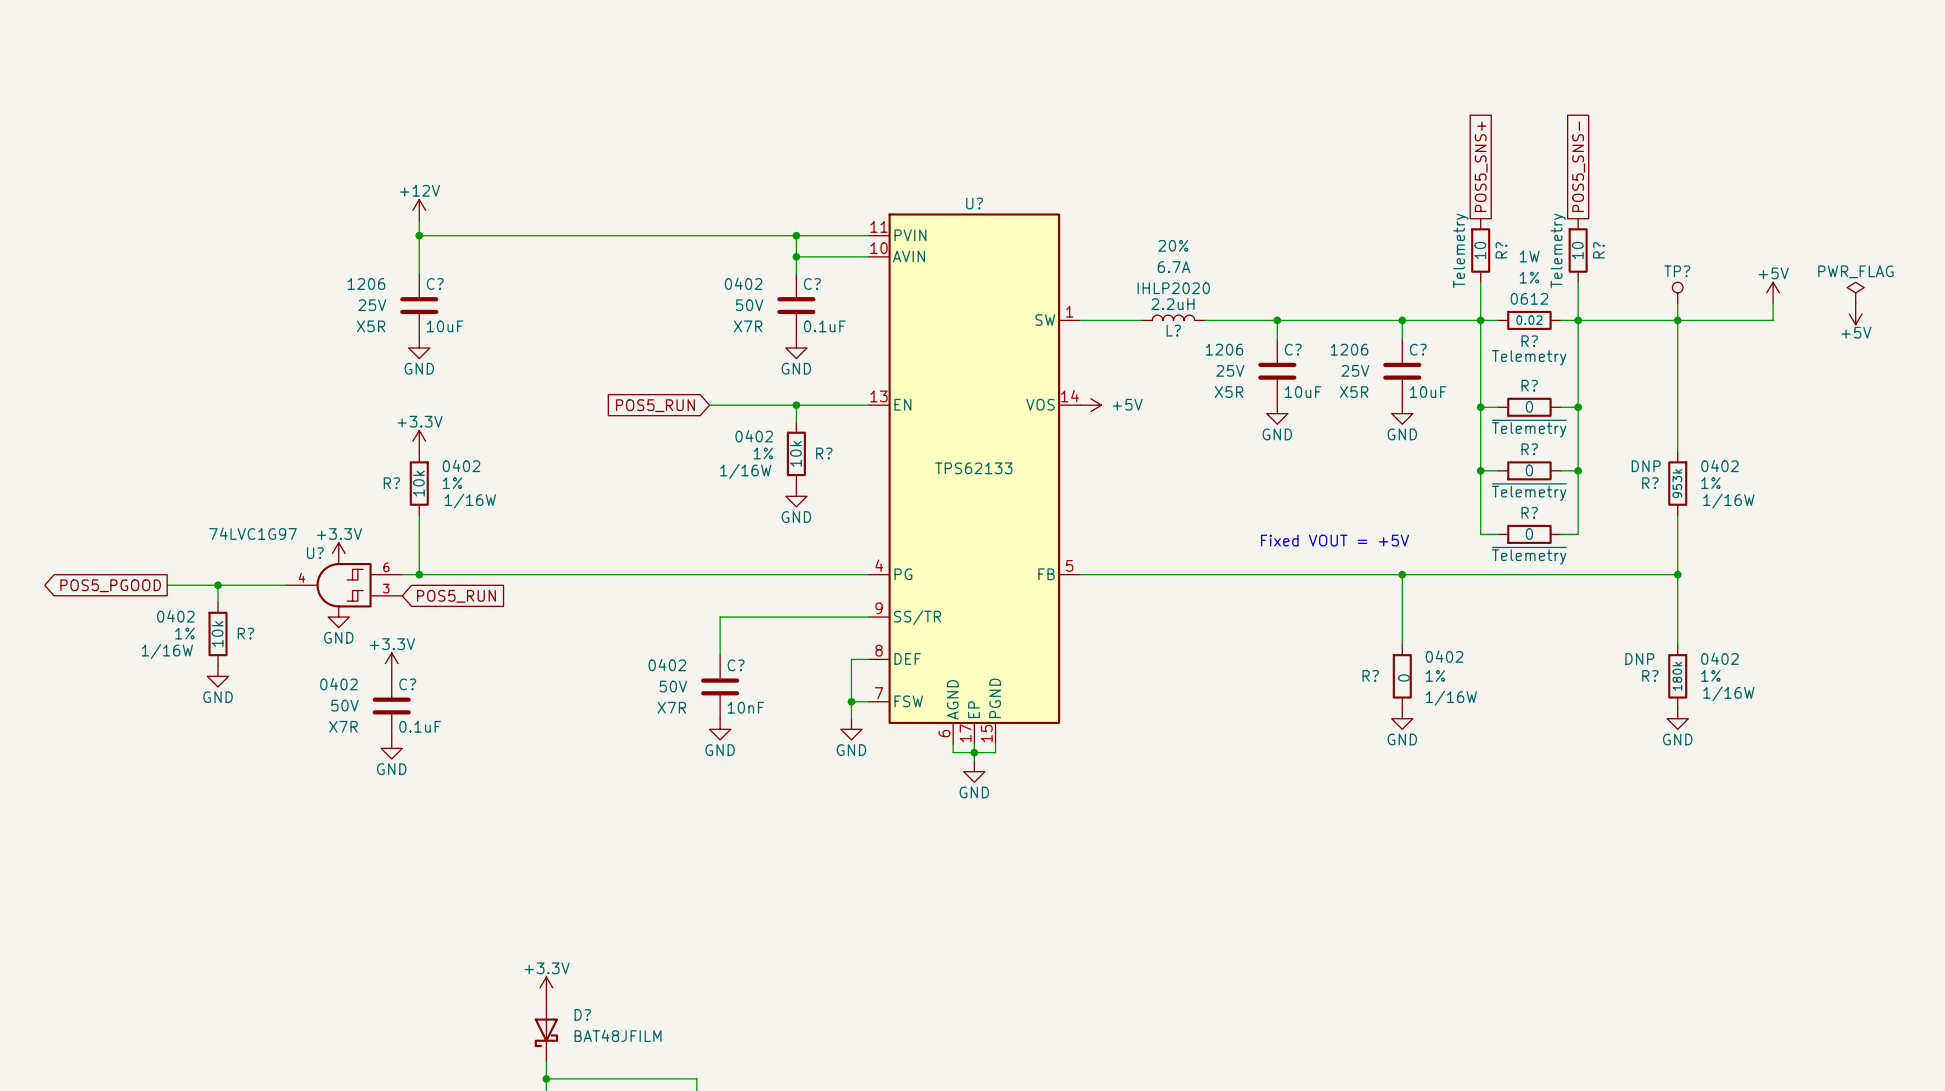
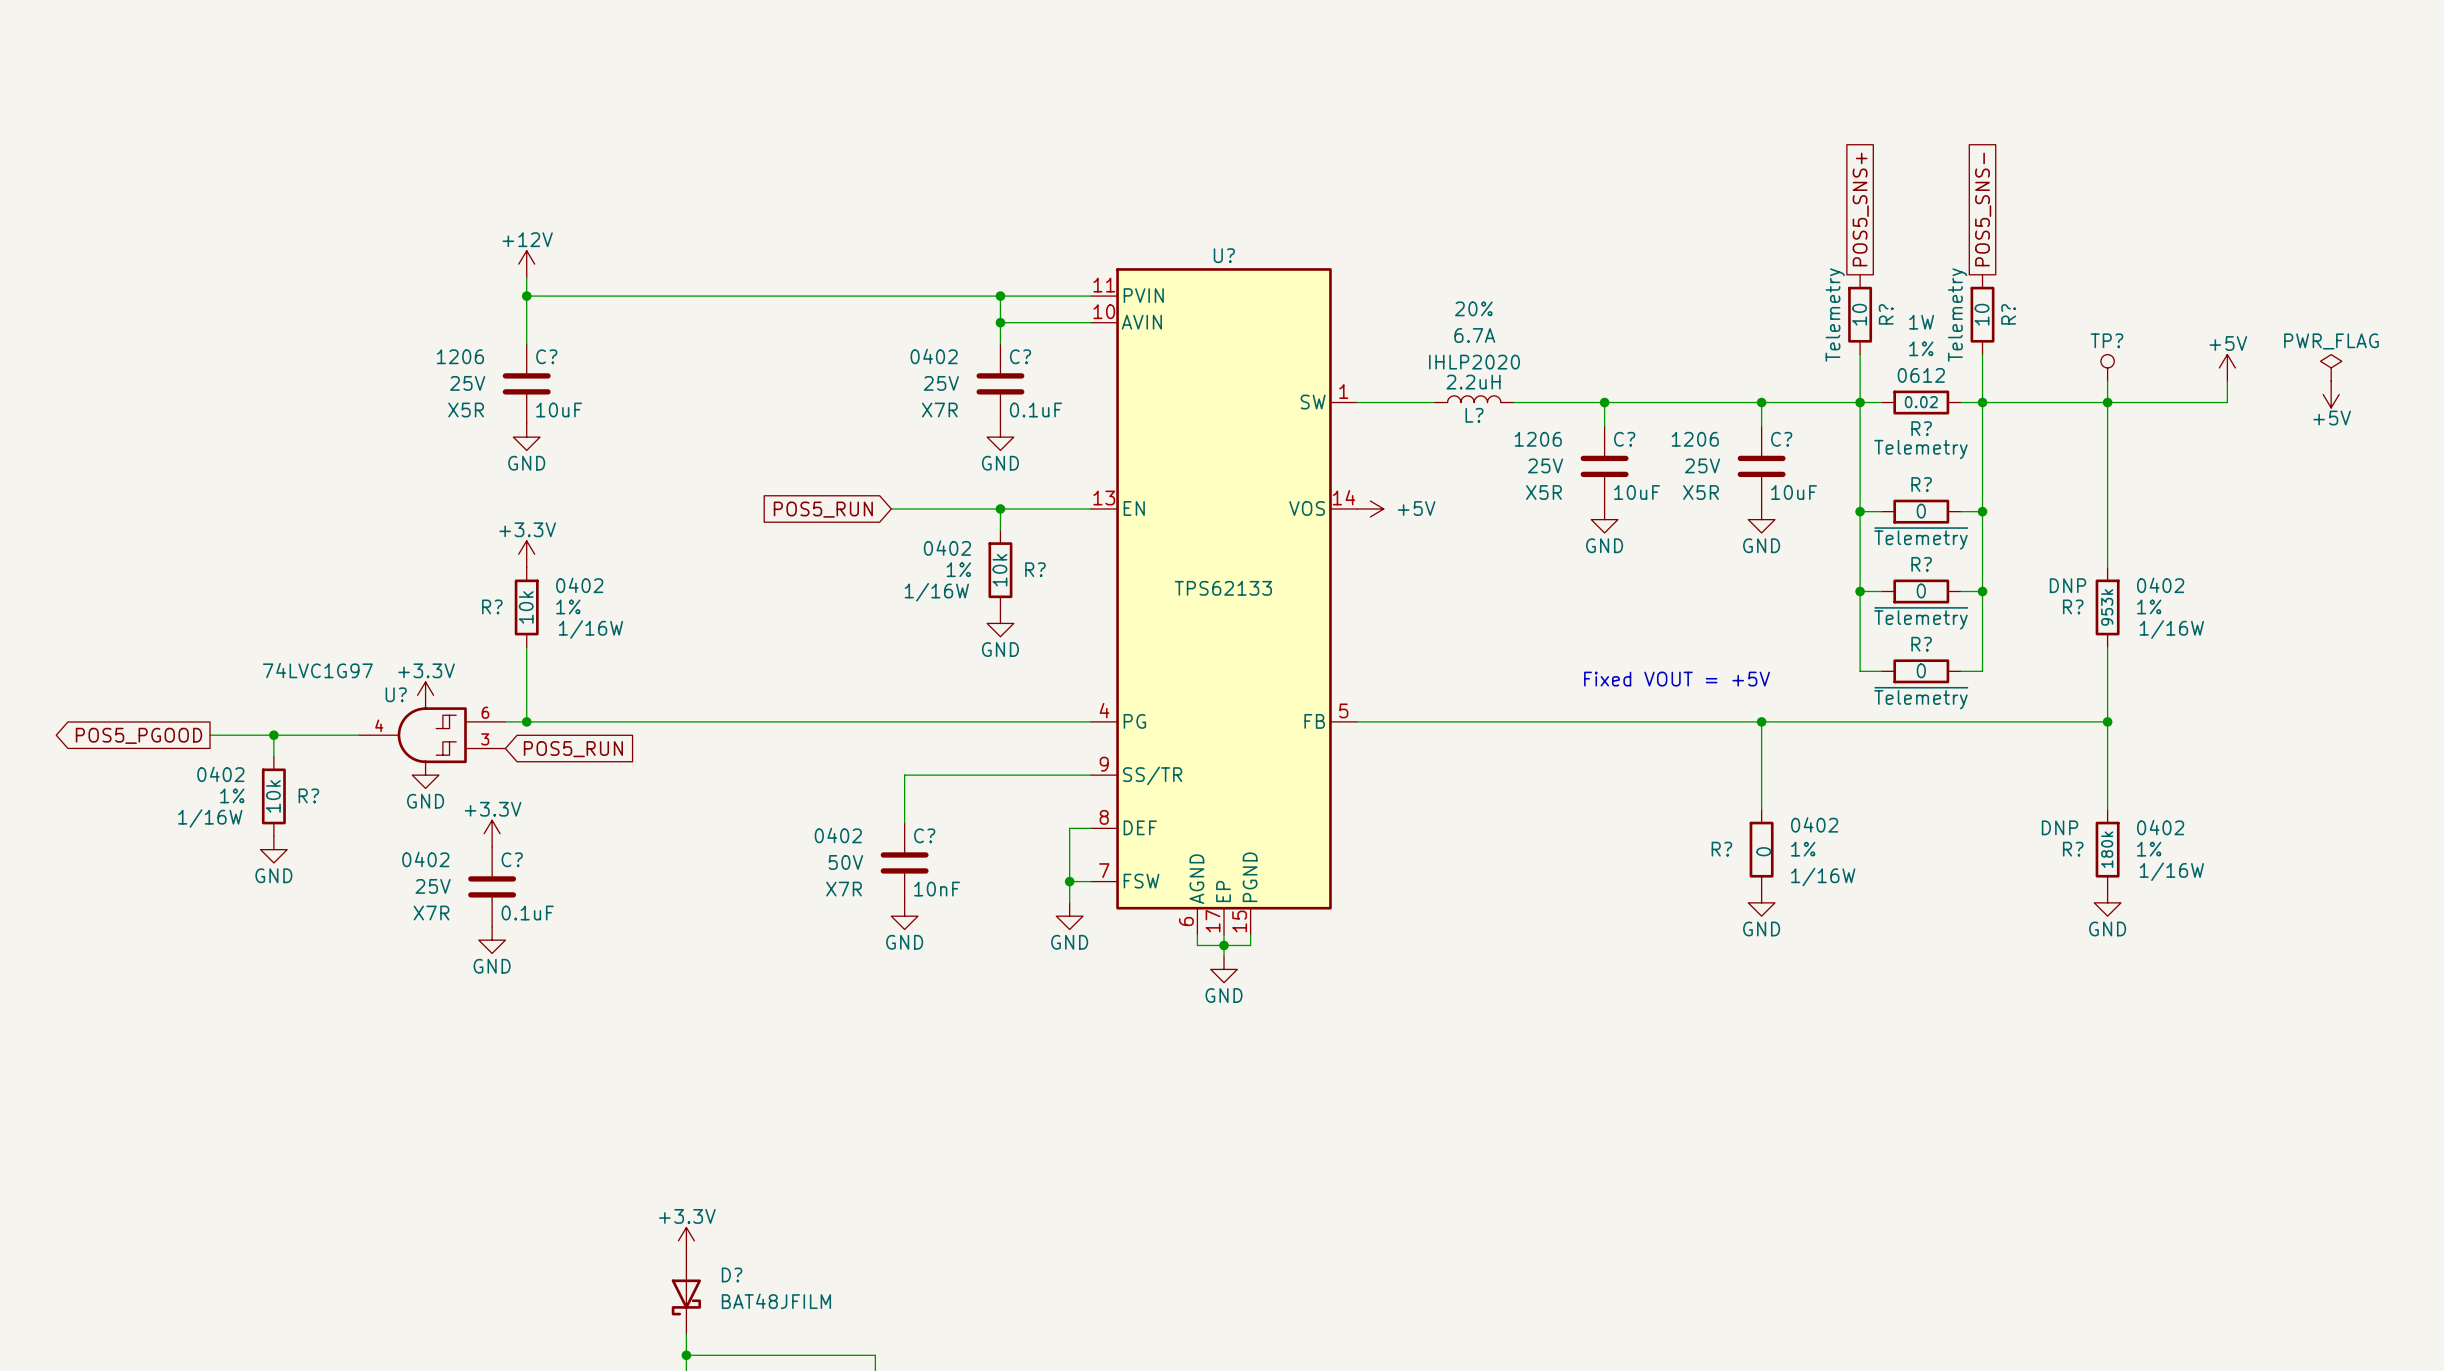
C? text: 50V (749, 305) -> 25V (941, 383)
C? text: 50V (344, 705) -> 25V (433, 886)

